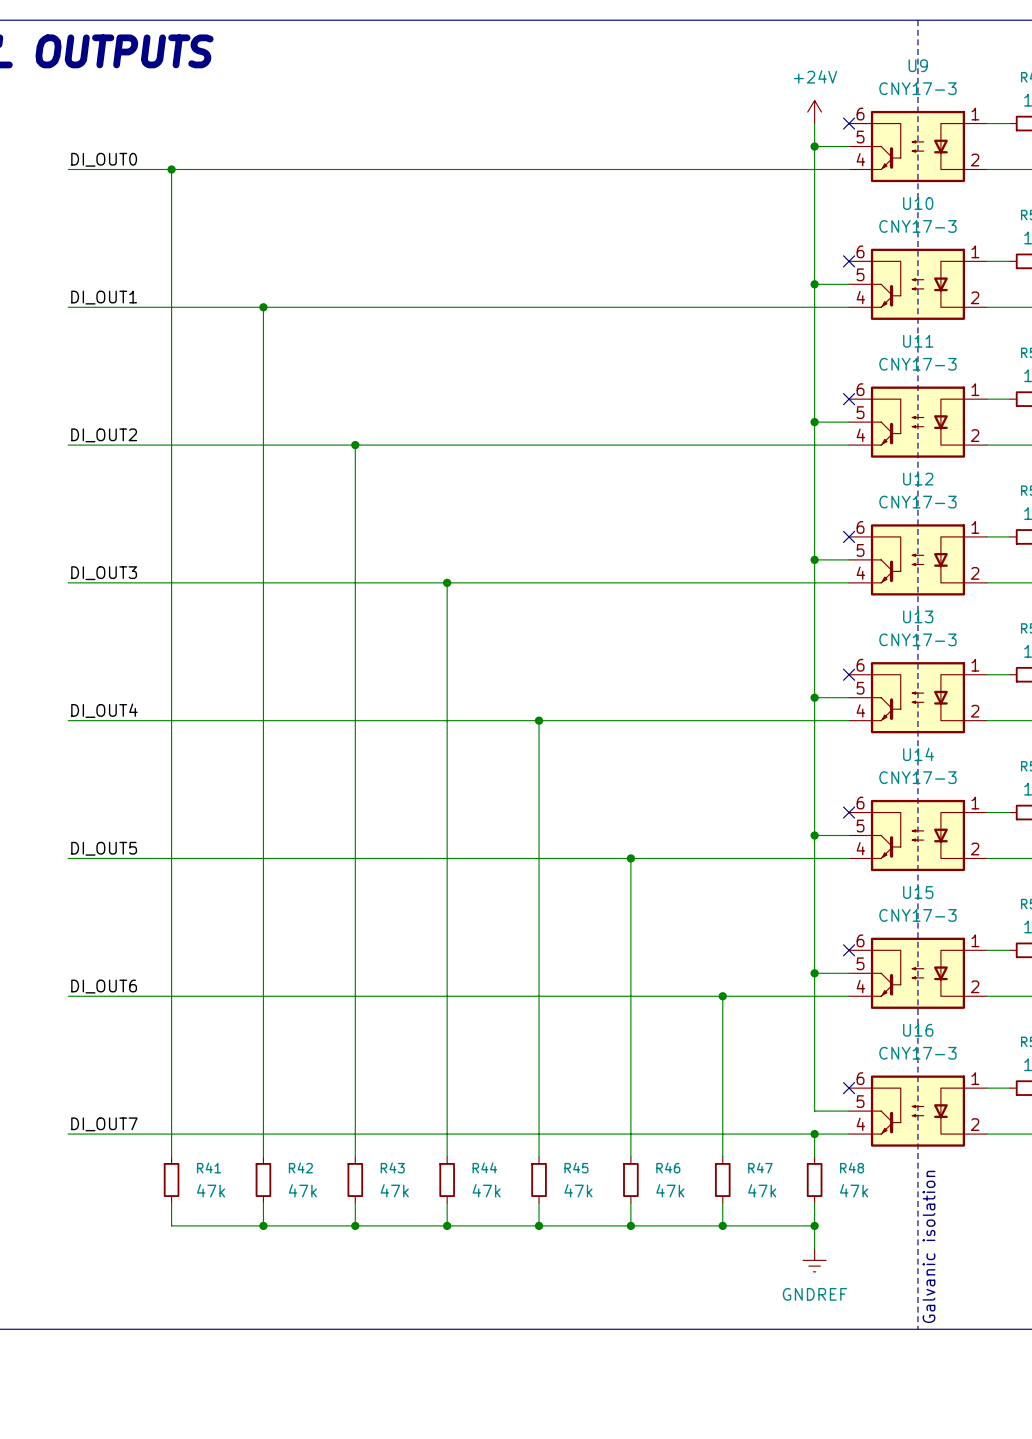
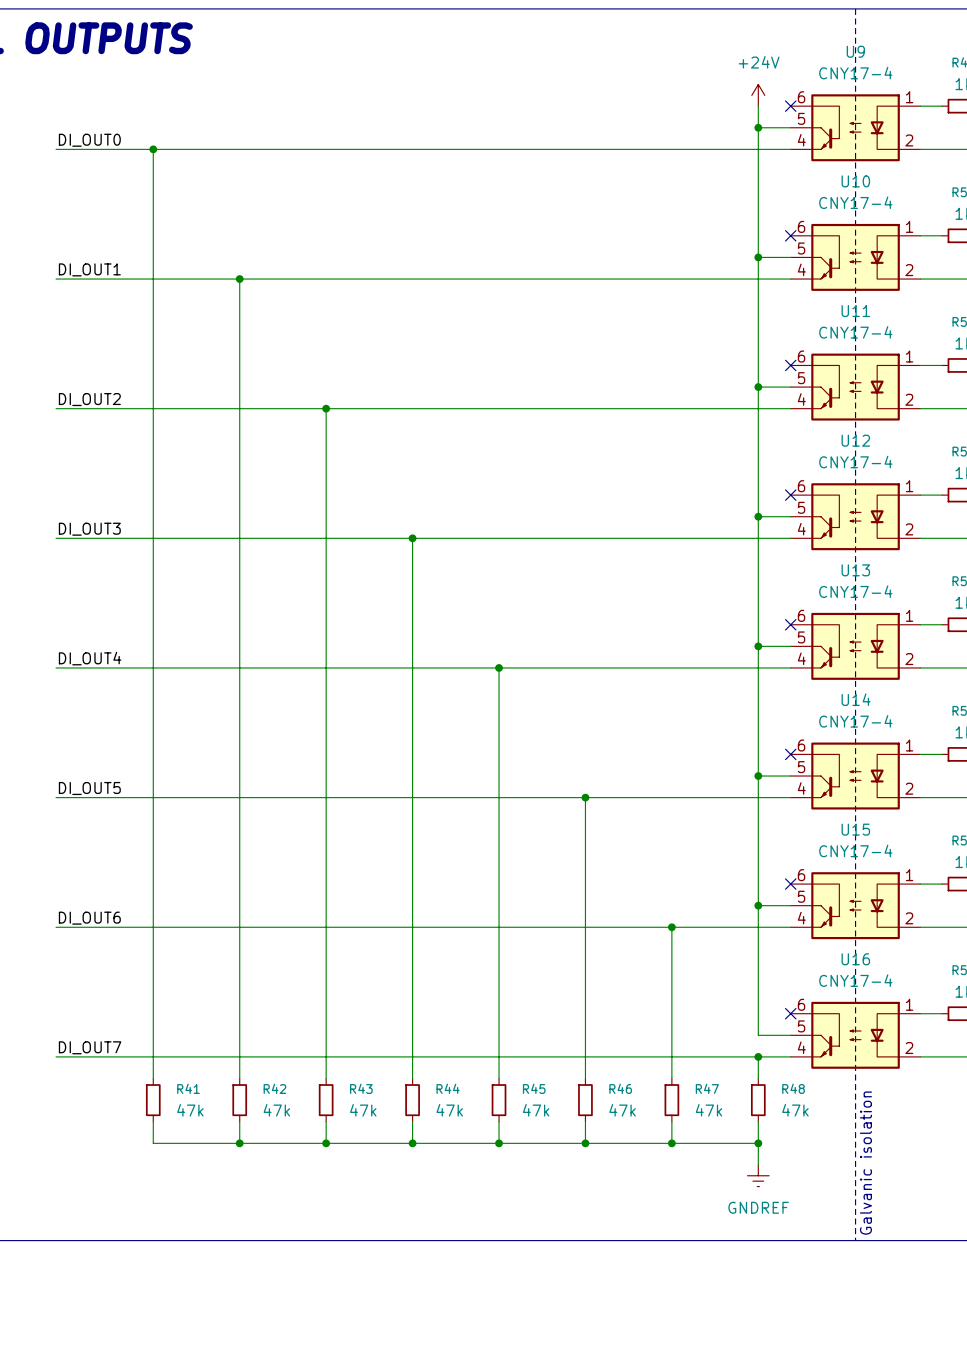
U9 value: CNY17-3 (917, 88) -> CNY17-4 (855, 73)
U10 value: CNY17-3 (917, 226) -> CNY17-4 (855, 202)
U11 value: CNY17-3 (917, 364) -> CNY17-4 (855, 332)
U12 value: CNY17-3 (917, 502) -> CNY17-4 (855, 462)
U13 value: CNY17-3 (917, 639) -> CNY17-4 (855, 591)
U14 value: CNY17-3 (917, 777) -> CNY17-4 (855, 721)
U15 value: CNY17-3 (917, 915) -> CNY17-4 (855, 850)
U16 value: CNY17-3 (917, 1053) -> CNY17-4 (855, 980)

